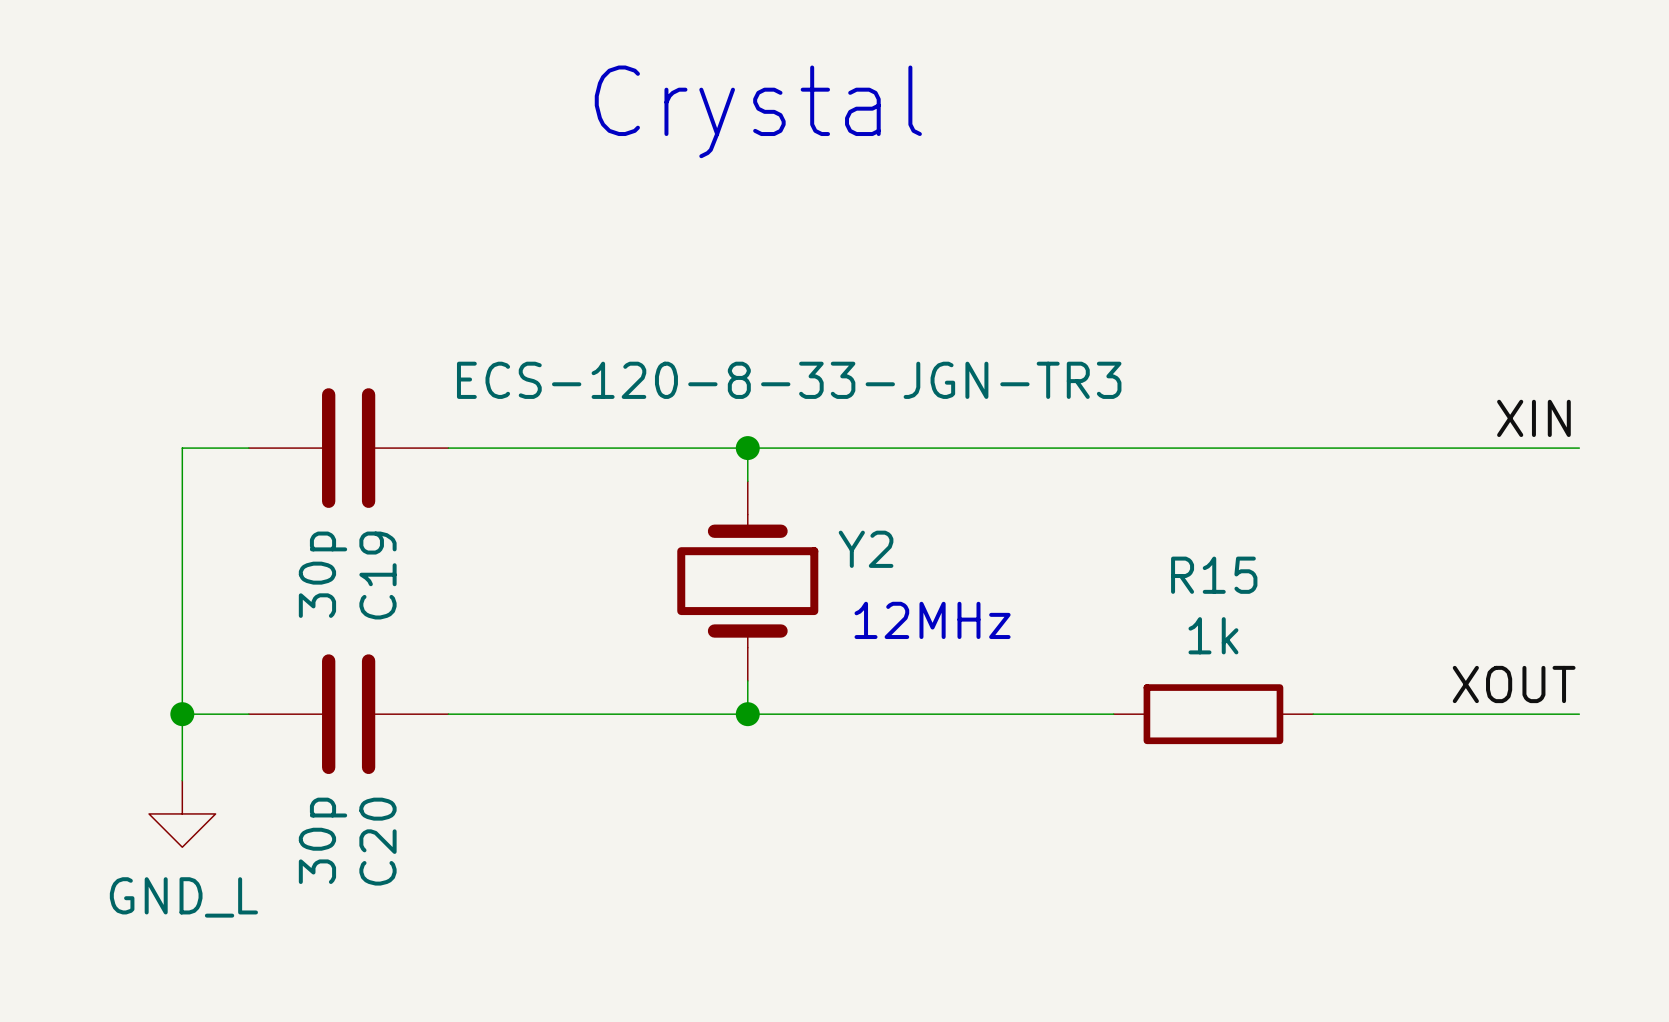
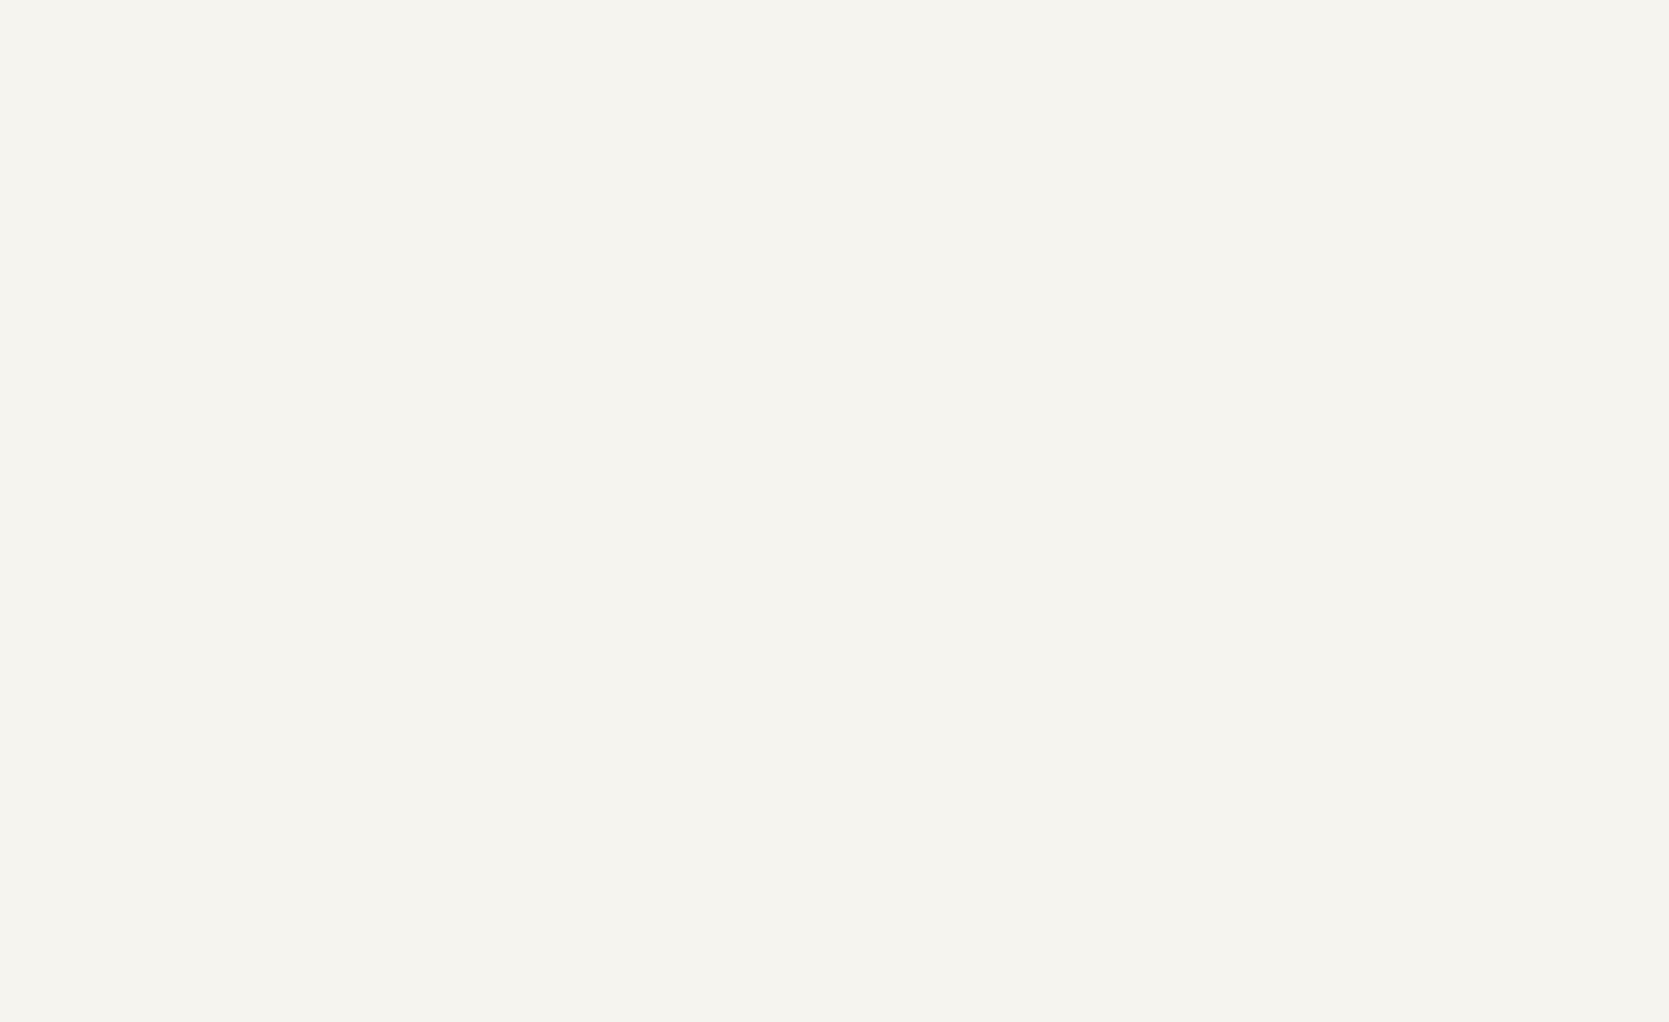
text: Crystal (758, 111) -> none
label: XIN (1533, 418) -> none
wire: (248, 448) (182, 448) (182, 780) -> none
C19: 30p (348, 448) -> none
wire: (448, 448) (1579, 448) -> none
wire: (747, 448) (747, 481) -> none
junction: (747, 448) -> none
Y2: ECS-120-8-33-JGN-TR3 (747, 581) -> none
text: 12MHz (932, 620) -> none
wire: (747, 680) (747, 714) -> none
label: XOUT (1514, 684) -> none
wire: (182, 714) (248, 714) -> none
junction: (182, 714) -> none
C20: 30p (348, 714) -> none
wire: (448, 714) (1113, 714) -> none
junction: (747, 714) -> none
R15: 1k (1213, 714) -> none
wire: (1313, 714) (1579, 714) -> none
power symbol: GND_L (182, 813) -> none

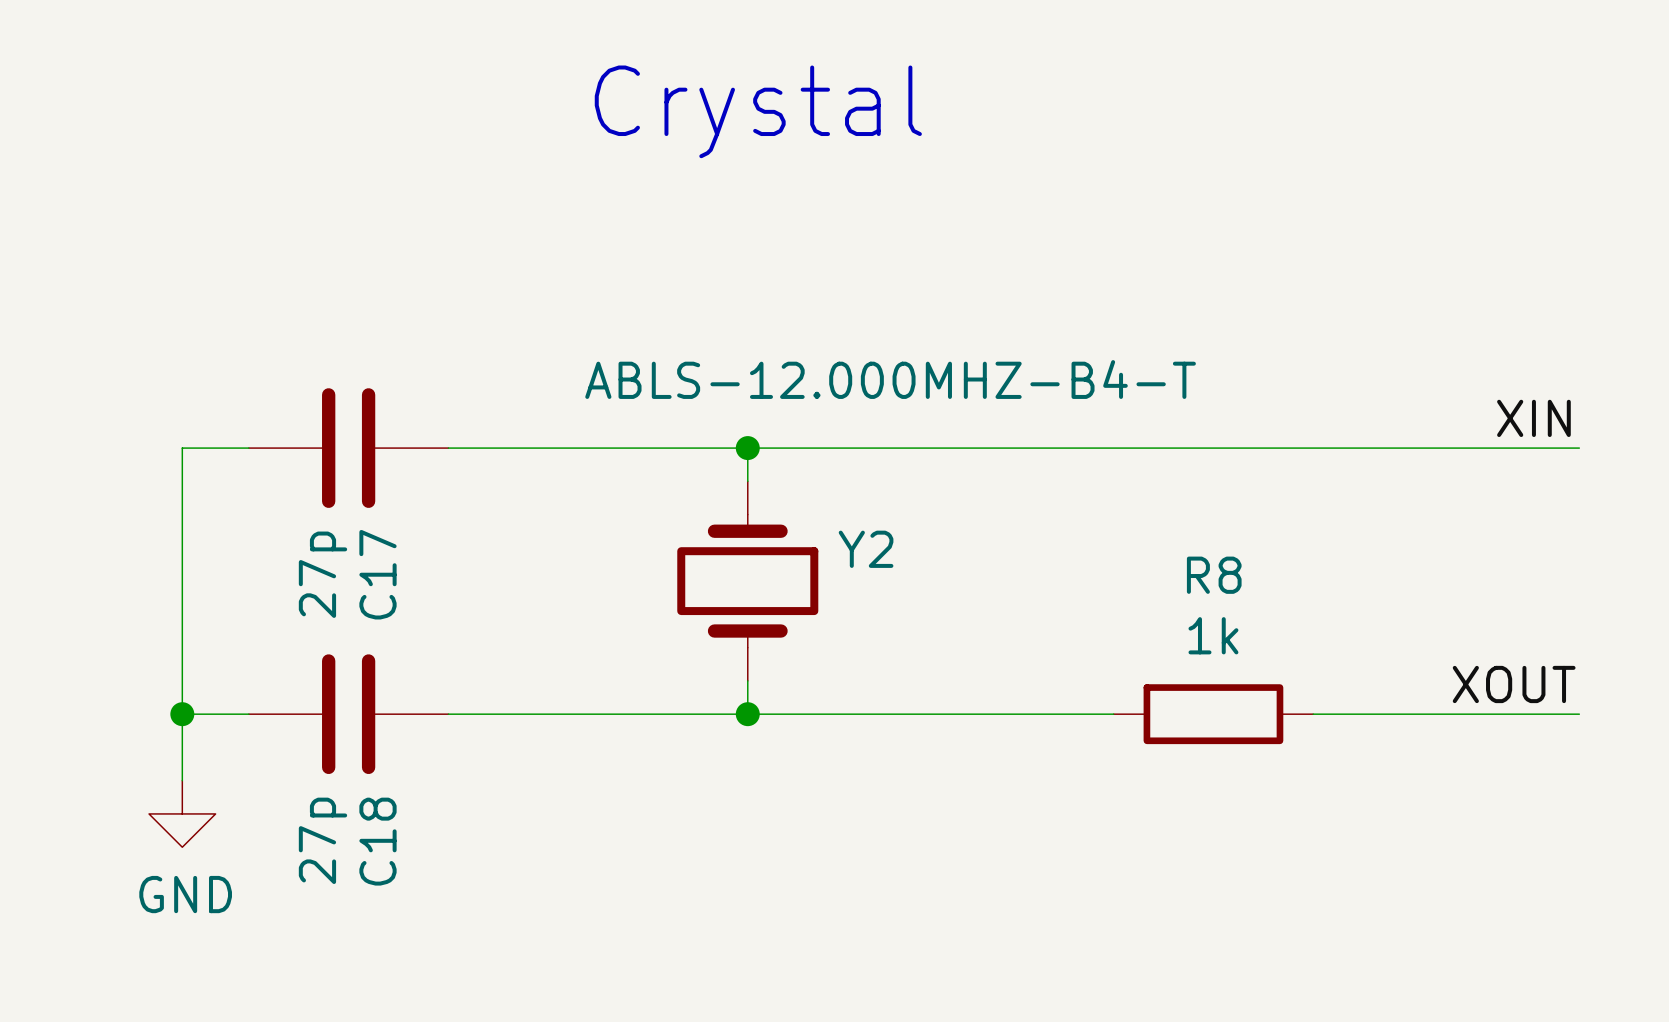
text: none -> Crystal (758, 111)
label: none -> XIN (1533, 418)
wire: none -> (248, 448) (182, 448) (182, 780)
C17: none -> 27p (348, 448)
wire: none -> (448, 448) (1579, 448)
wire: none -> (747, 448) (747, 481)
junction: none -> (747, 448)
Y2: none -> ABLS-12.000MHZ-B4-T (747, 581)
wire: none -> (747, 680) (747, 714)
label: none -> XOUT (1514, 684)
wire: none -> (182, 714) (248, 714)
junction: none -> (182, 714)
C18: none -> 27p (348, 714)
wire: none -> (448, 714) (1113, 714)
junction: none -> (747, 714)
R8: none -> 1k (1213, 714)
wire: none -> (1313, 714) (1579, 714)
power symbol: none -> GND (182, 813)

